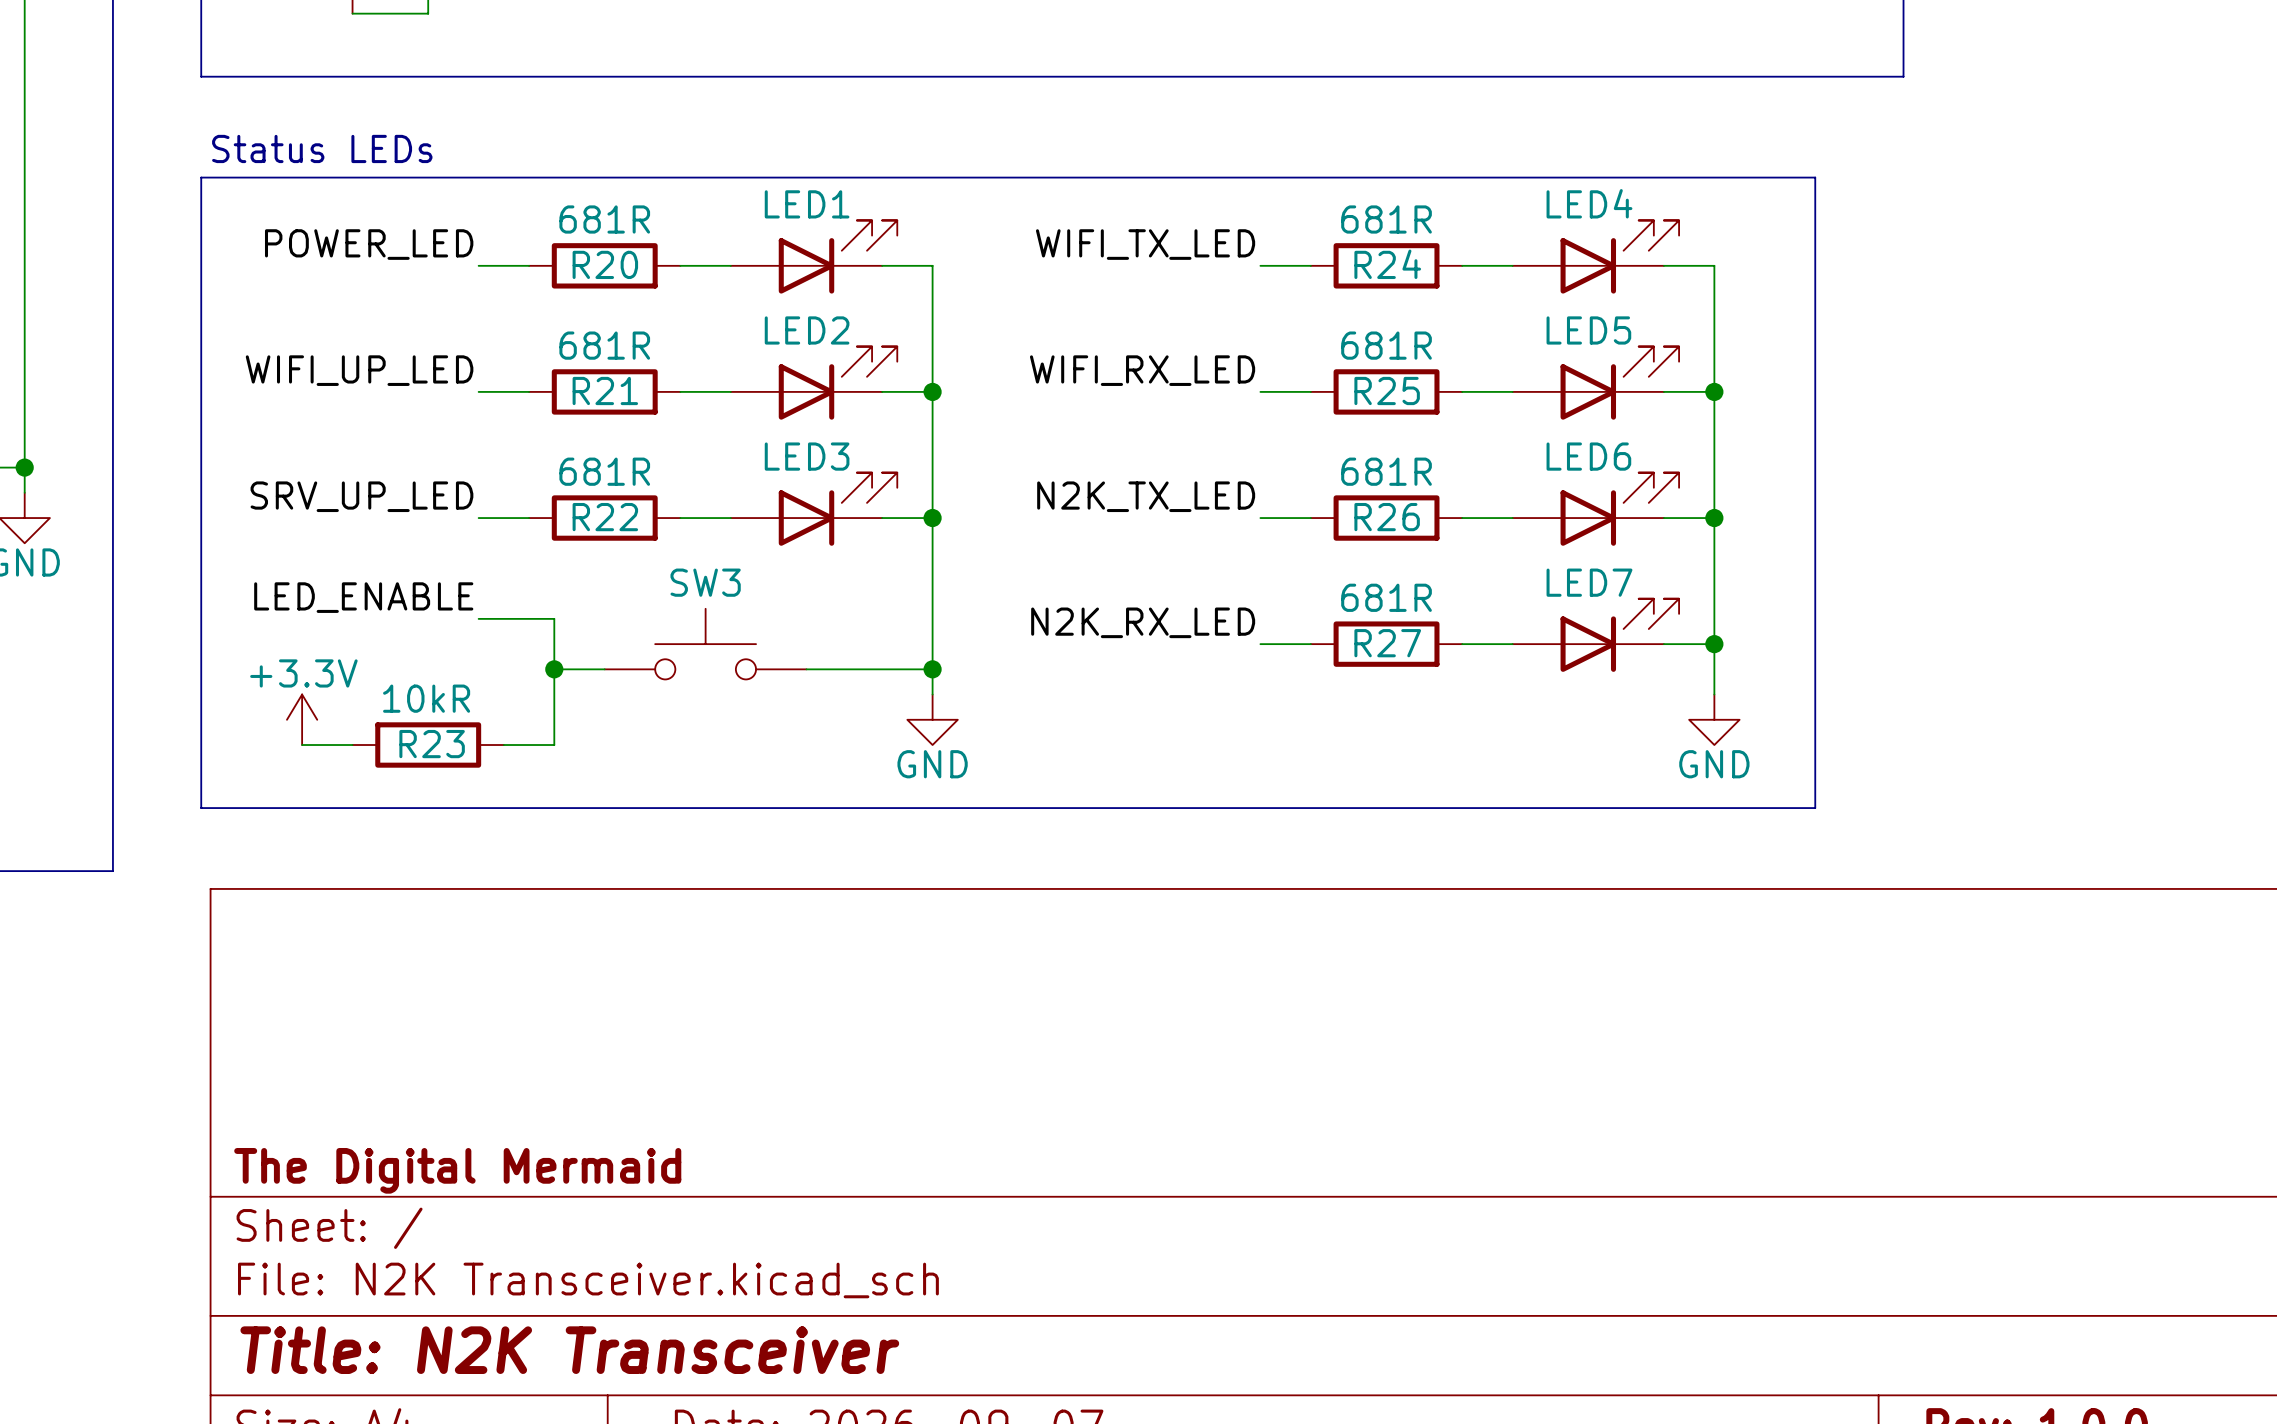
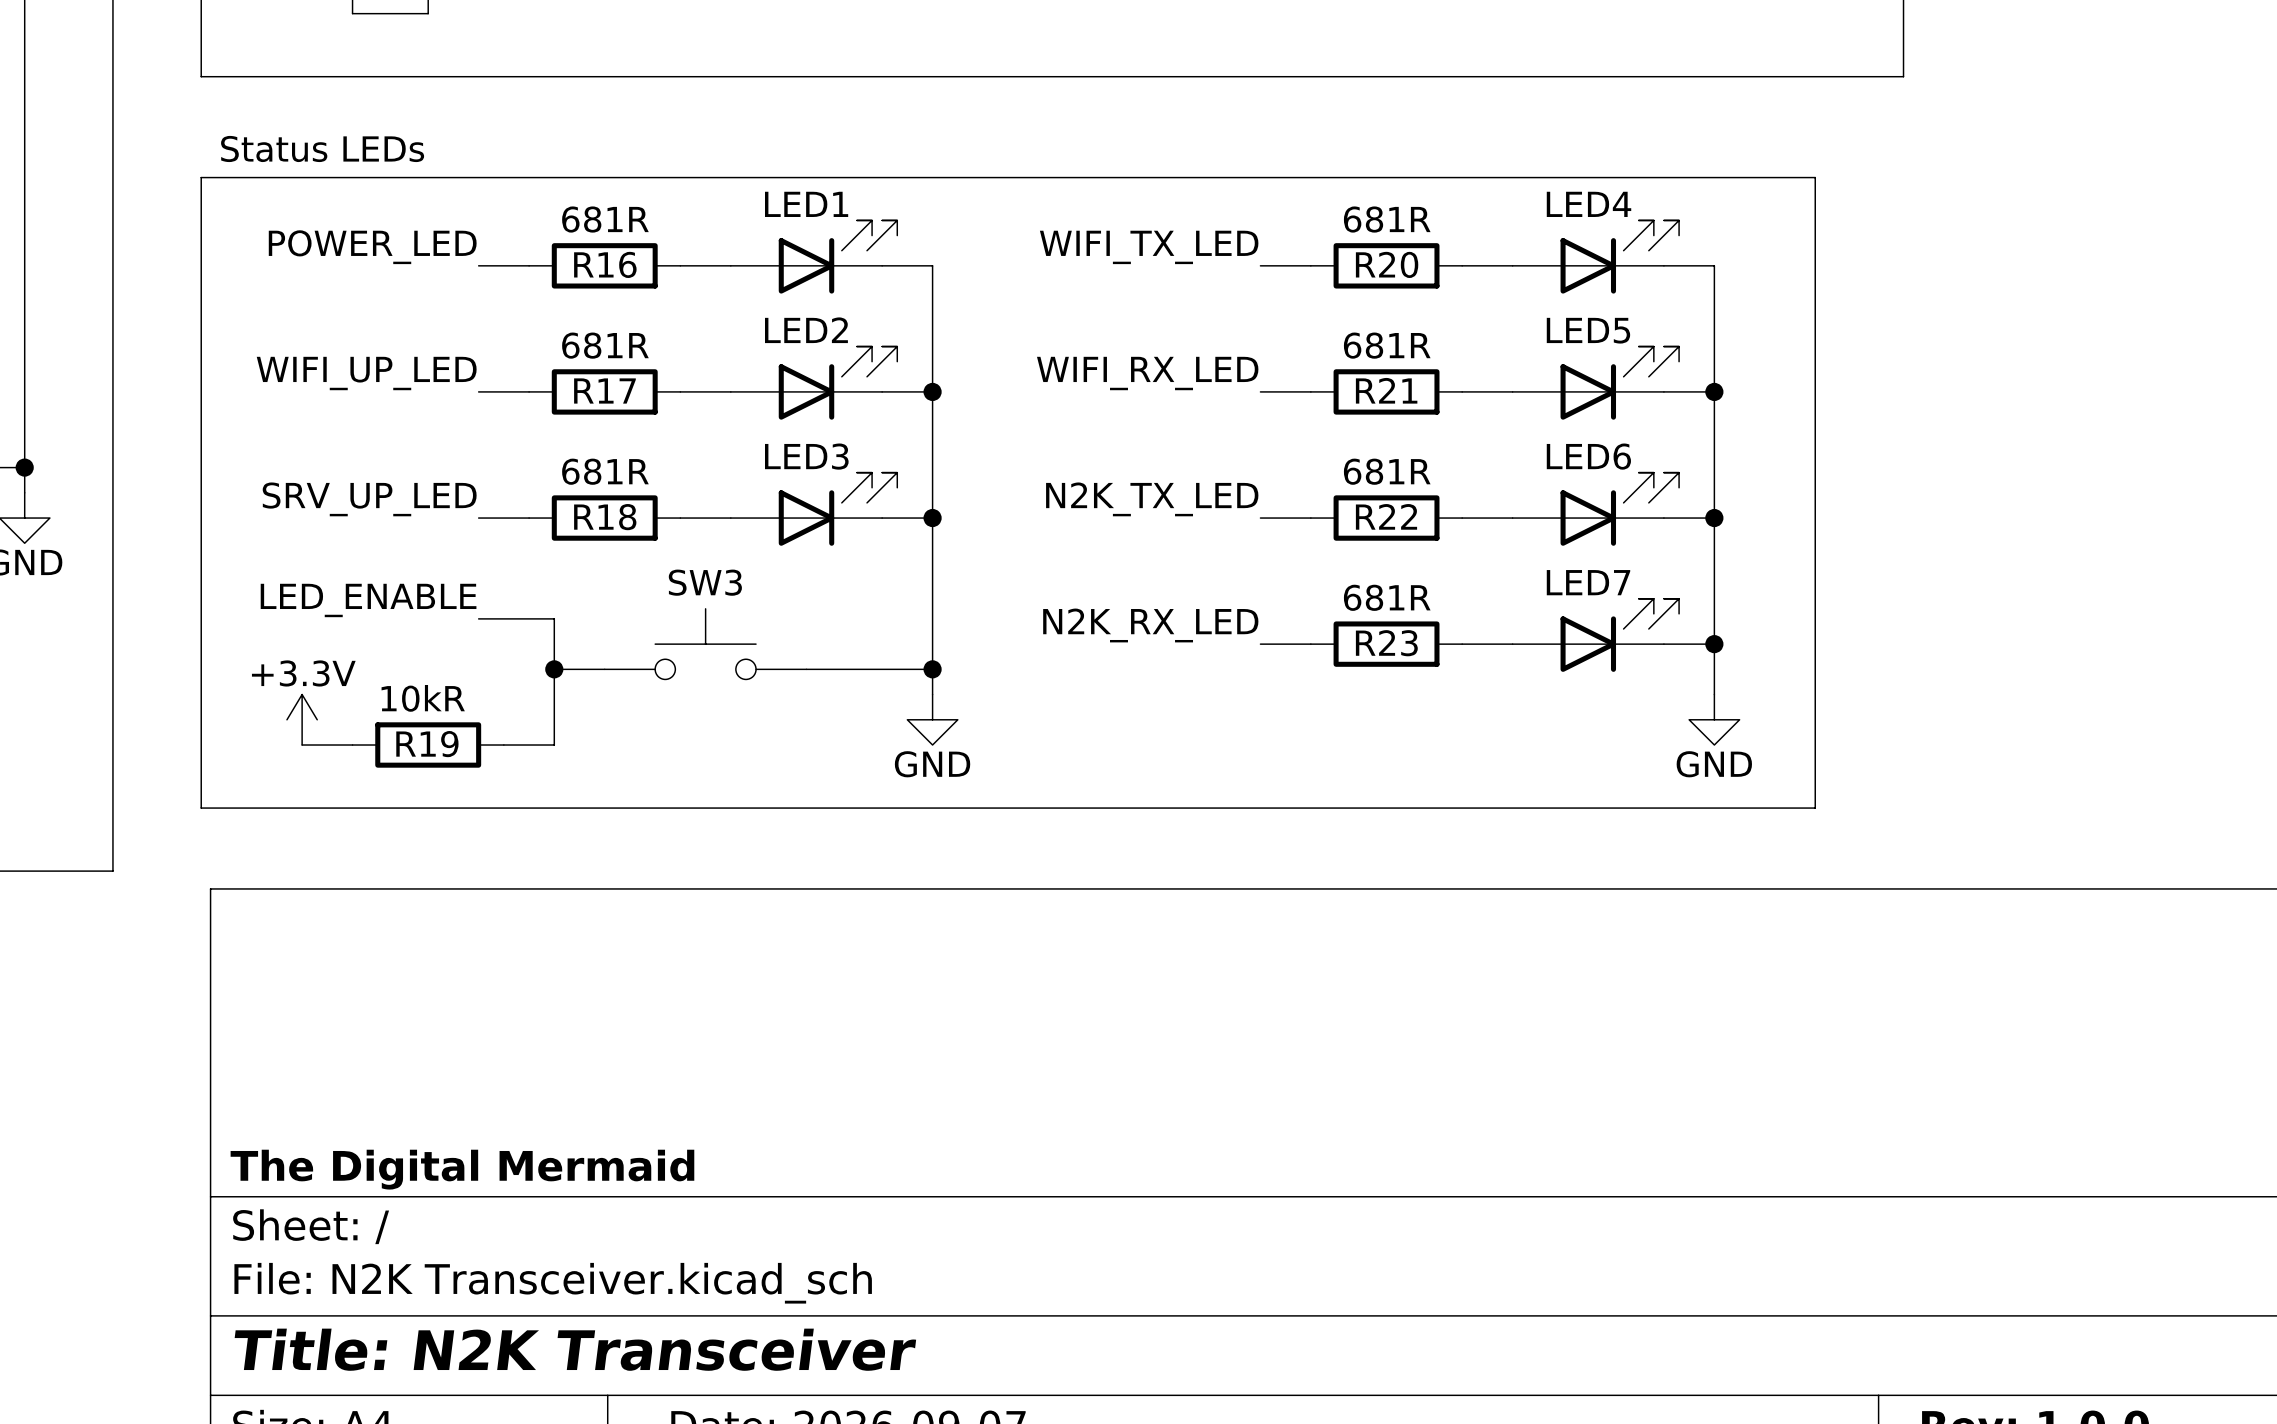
R20 name: R20 (605, 264) -> R16 (605, 264)
R24 name: R24 (1387, 264) -> R20 (1387, 264)
R21 name: R21 (605, 390) -> R17 (604, 390)
R25 name: R25 (1387, 390) -> R21 (1386, 390)
R22 name: R22 (605, 517) -> R18 (605, 517)
R26 name: R26 (1387, 517) -> R22 (1386, 516)
R27 name: R27 (1387, 643) -> R23 (1386, 643)
R23 name: R23 (432, 744) -> R19 (427, 744)

